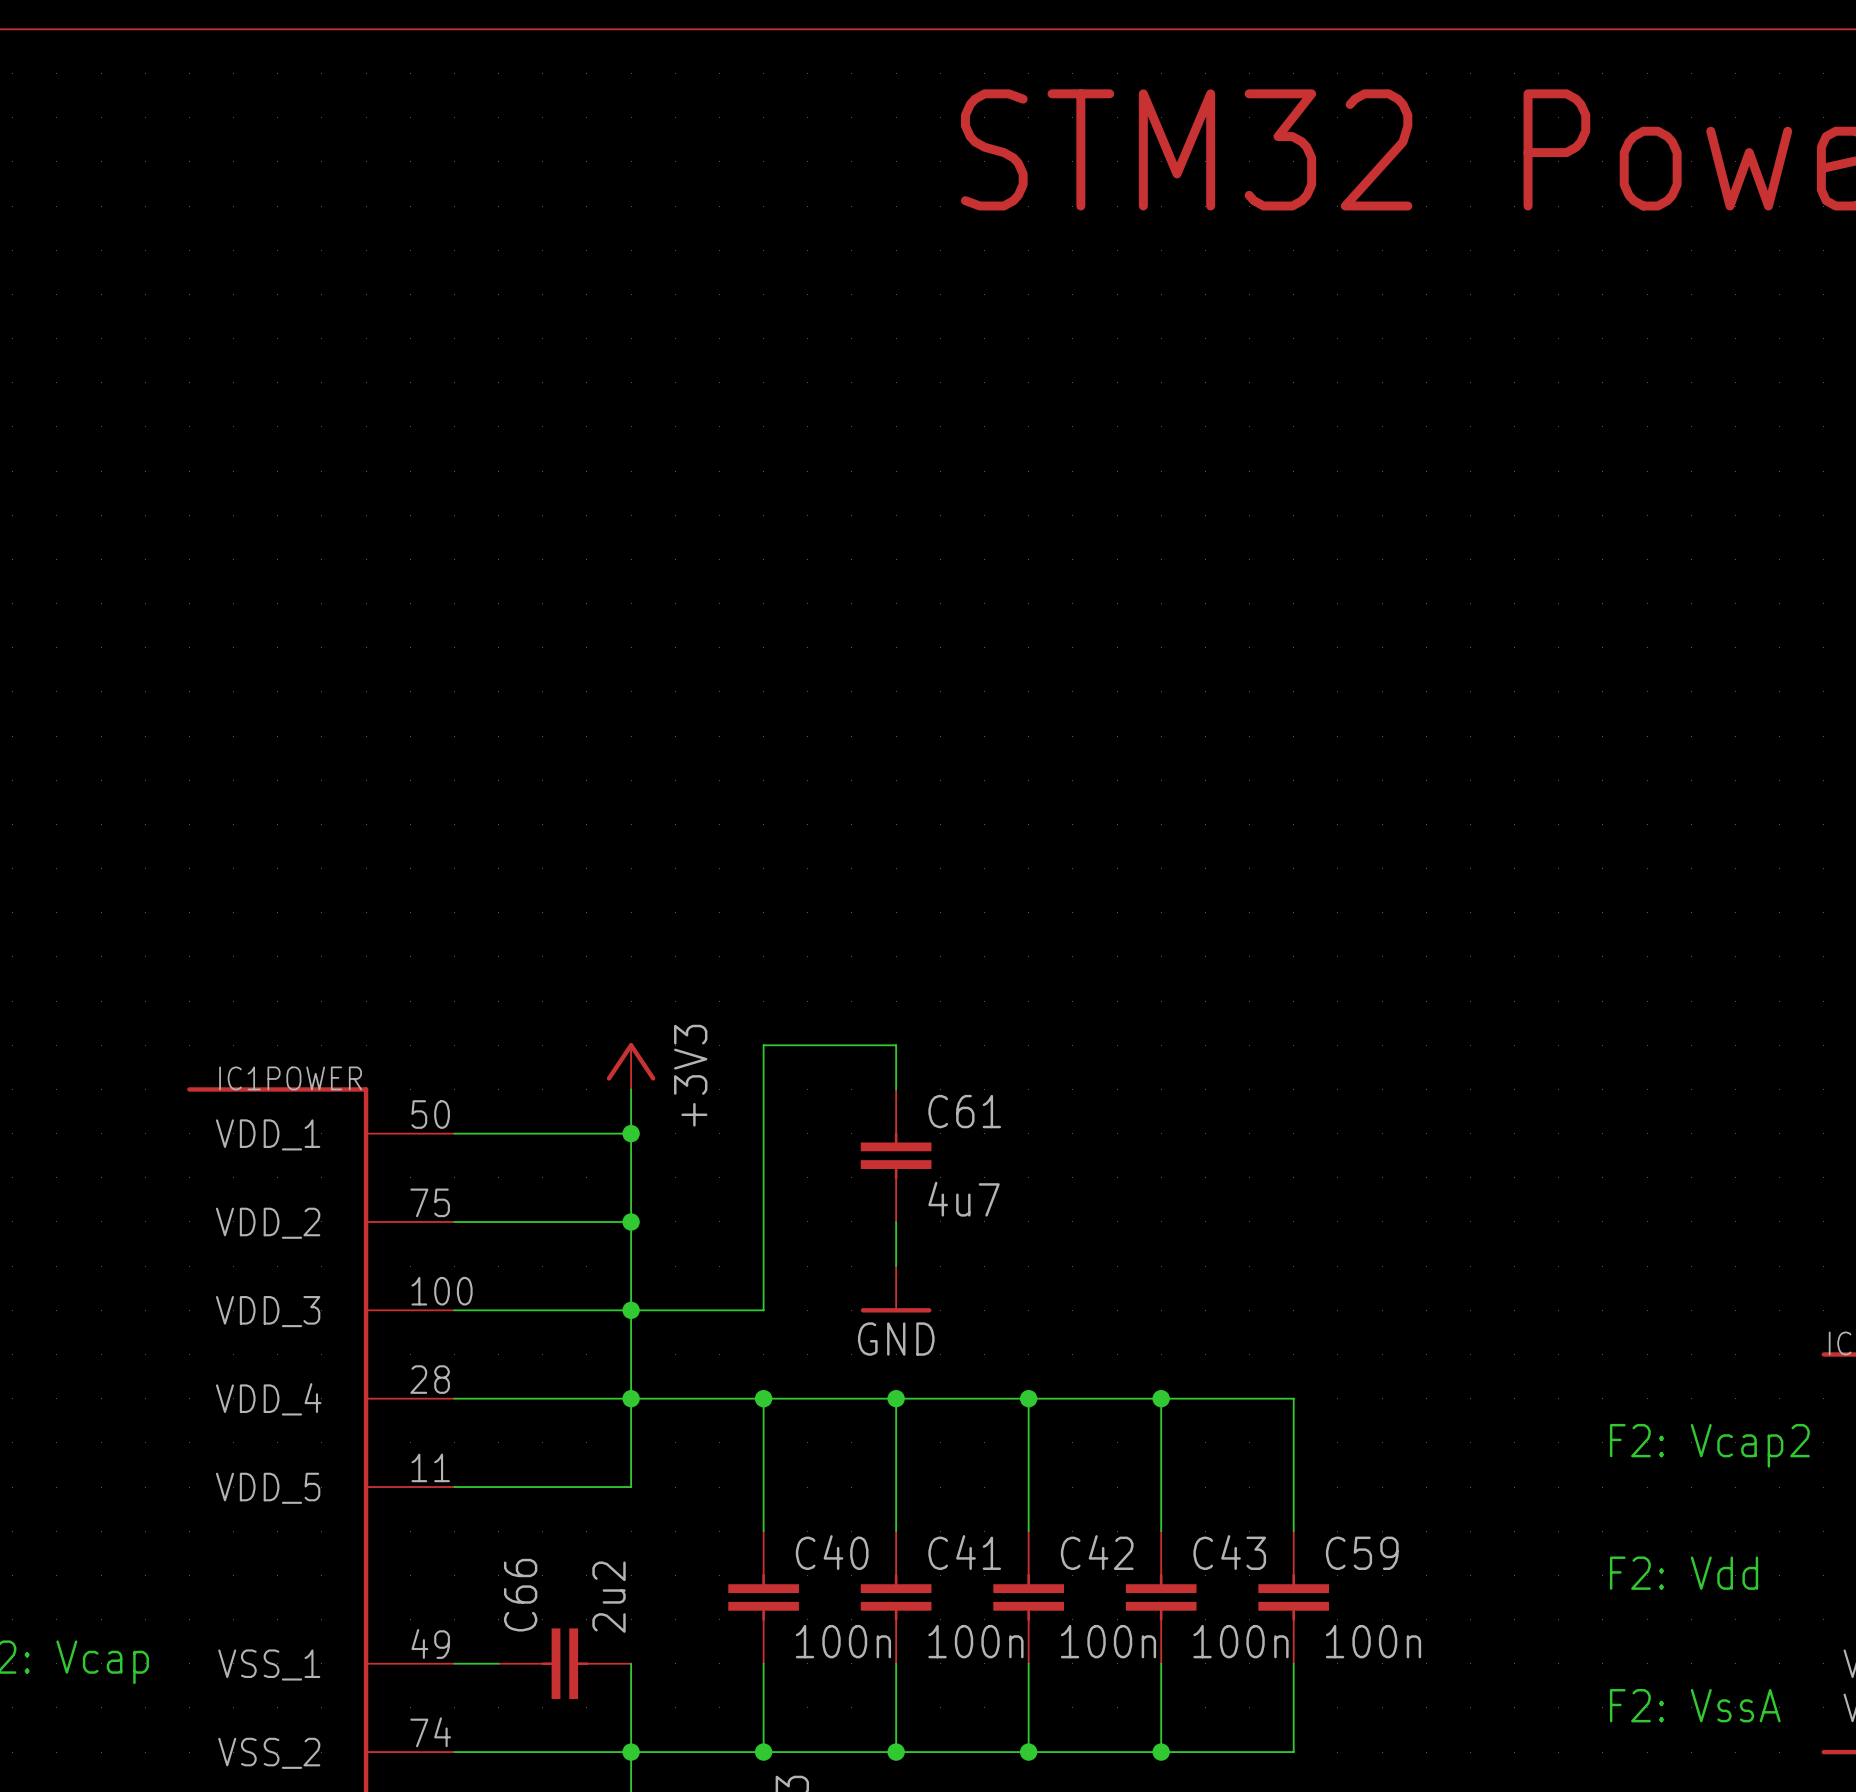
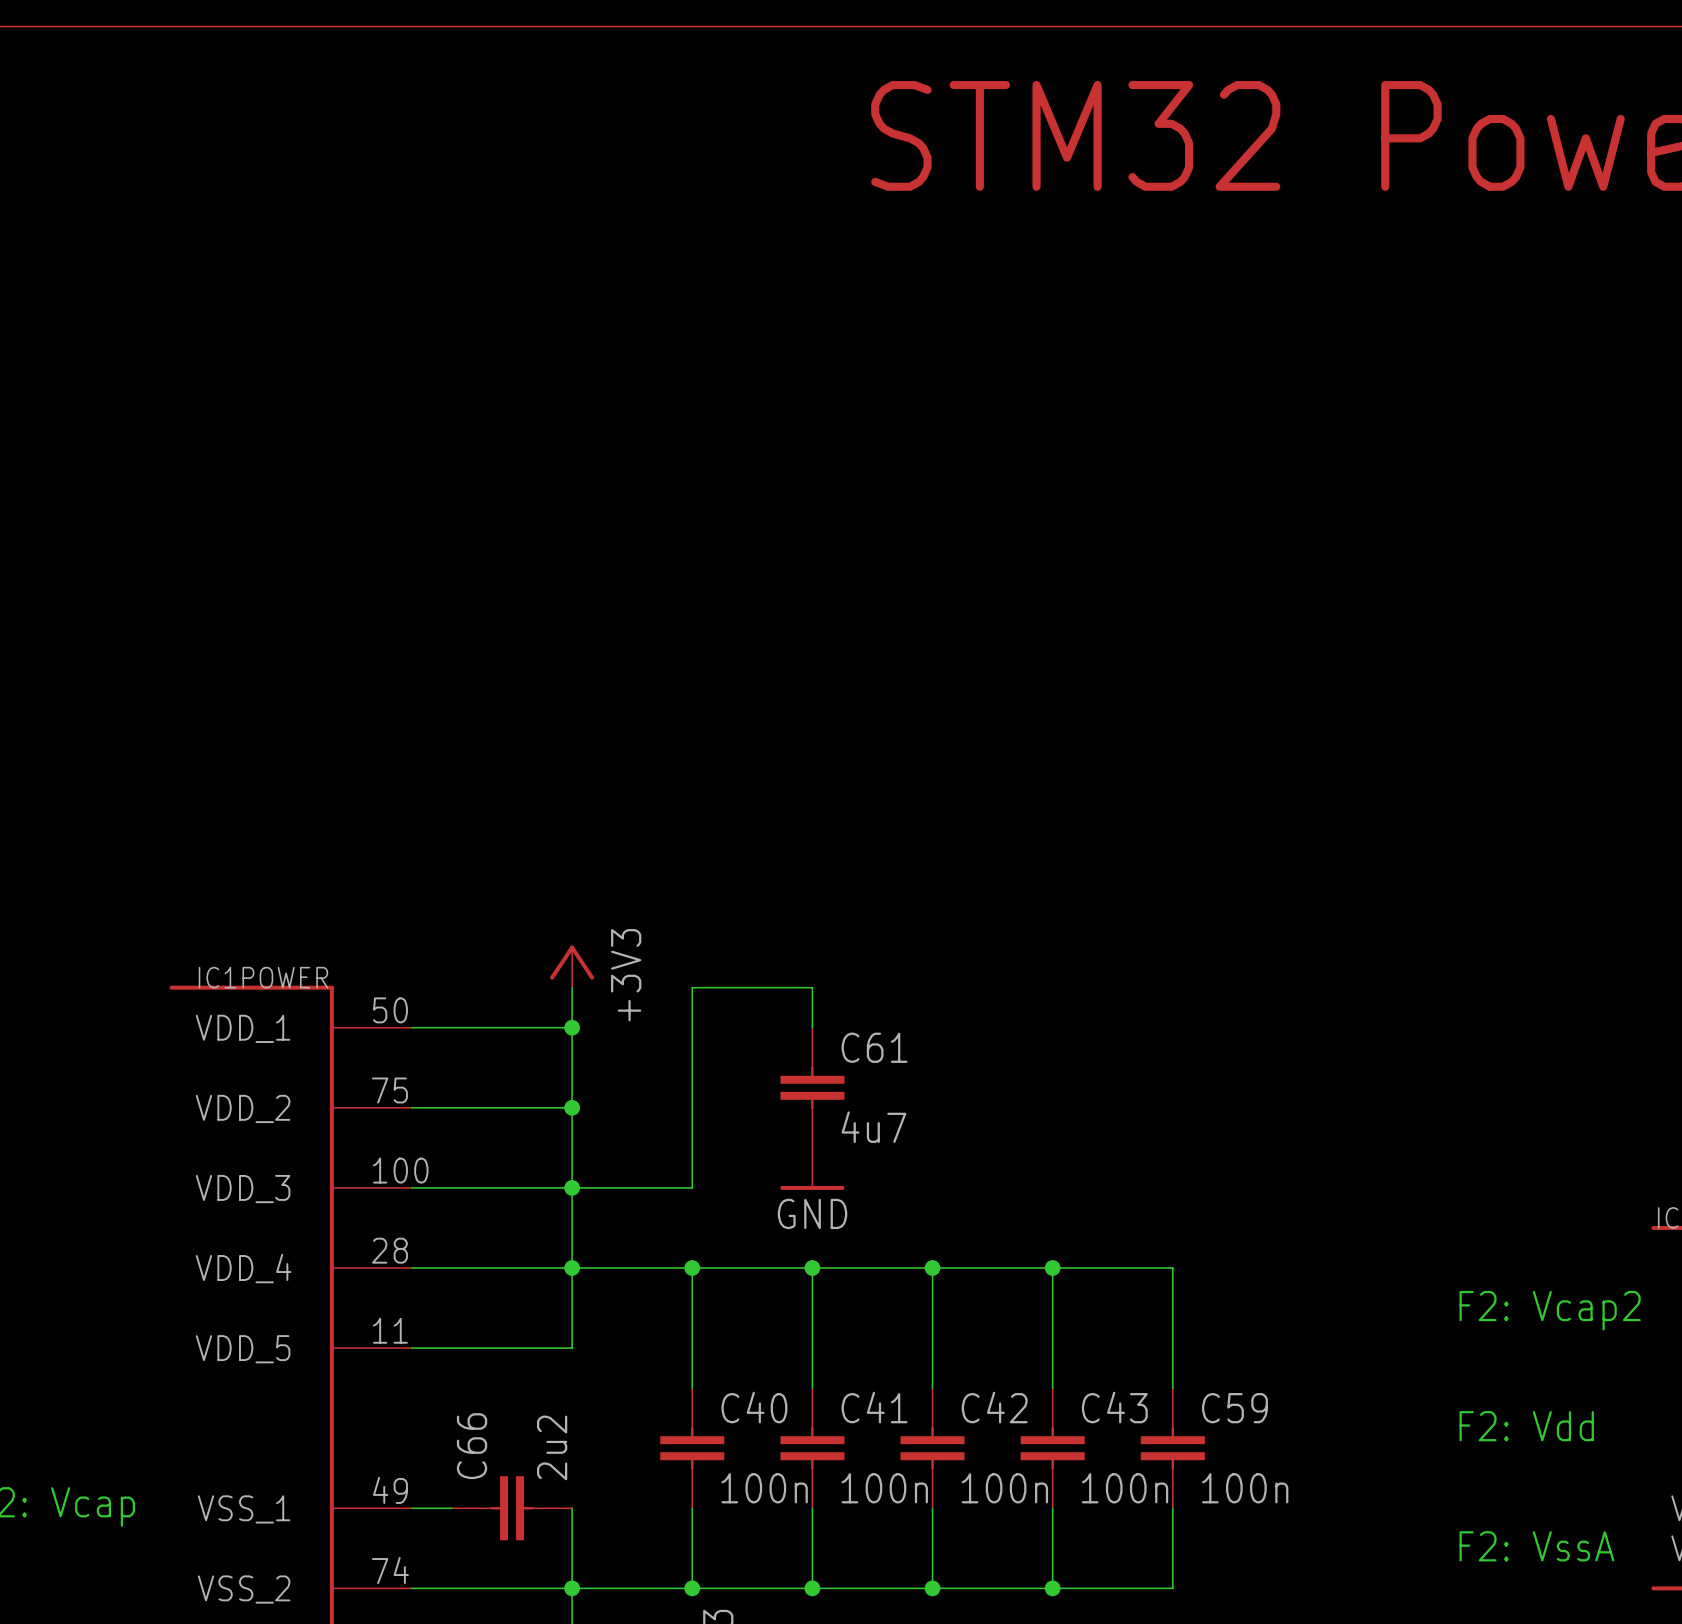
wire: (763, 1089) (763, 1045) (896, 1045) (896, 1089) -> (692, 987) (812, 987) (812, 1027)
C61 position: (896, 1155) -> (812, 1087)

